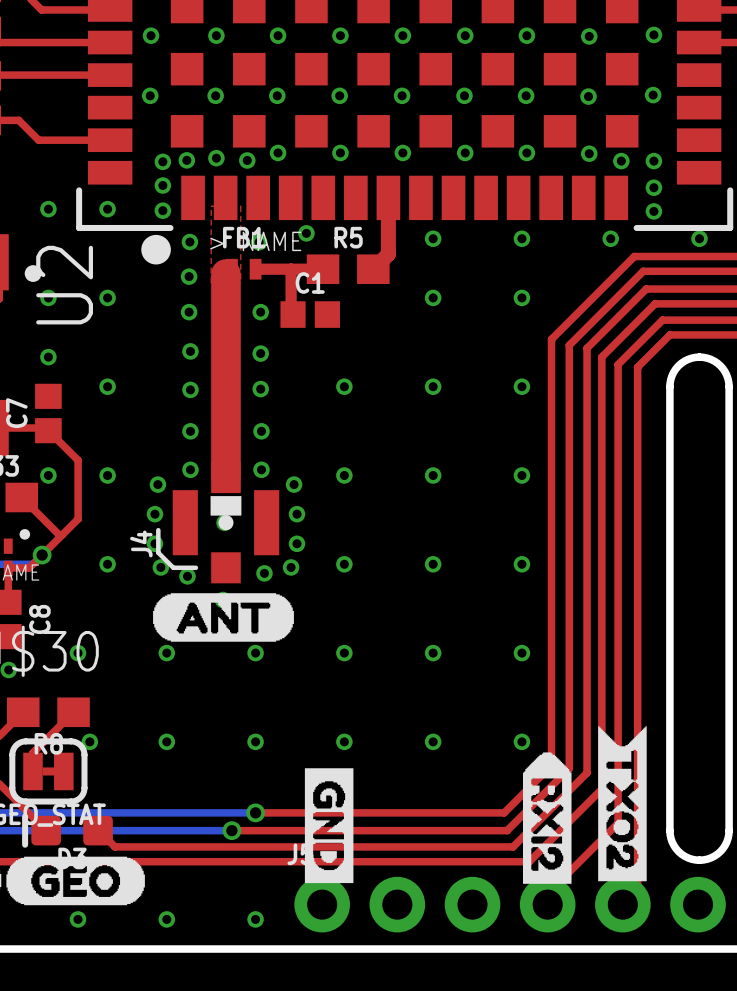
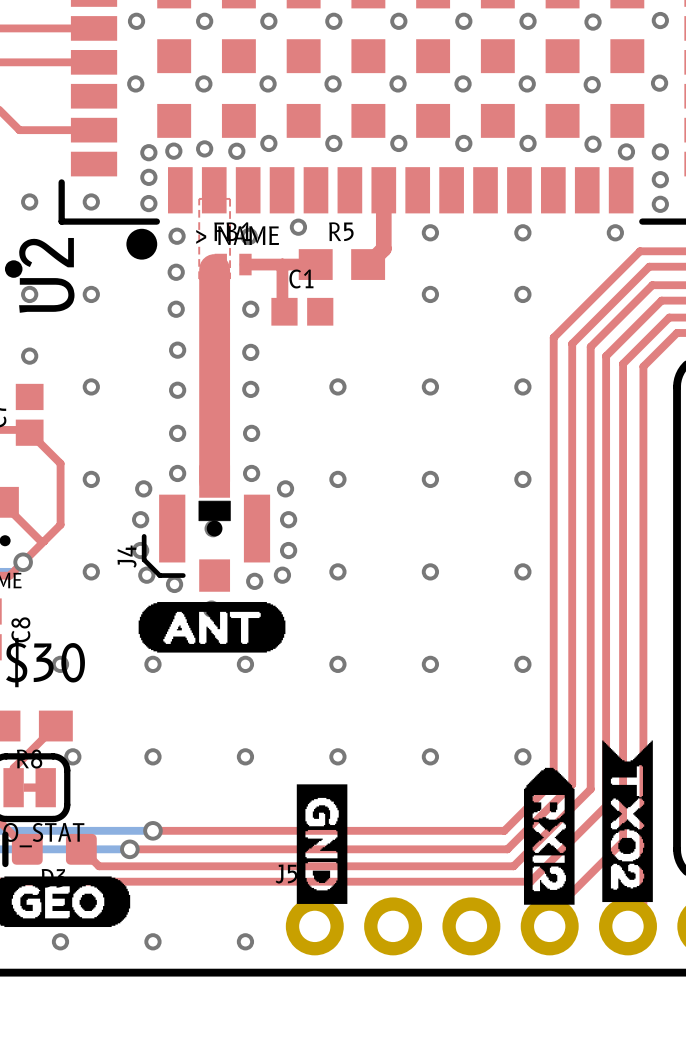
via: (48, 475) -> none
top track: none -> (152, 830) (245, 830)
bottom track: (166, 812) (255, 812) -> none
via: none -> (152, 830)
via: (255, 812) -> none
top track: none -> (129, 849) (220, 849)
bottom track: (144, 830) (231, 830) -> none
via: none -> (129, 849)
via: (231, 830) -> none

